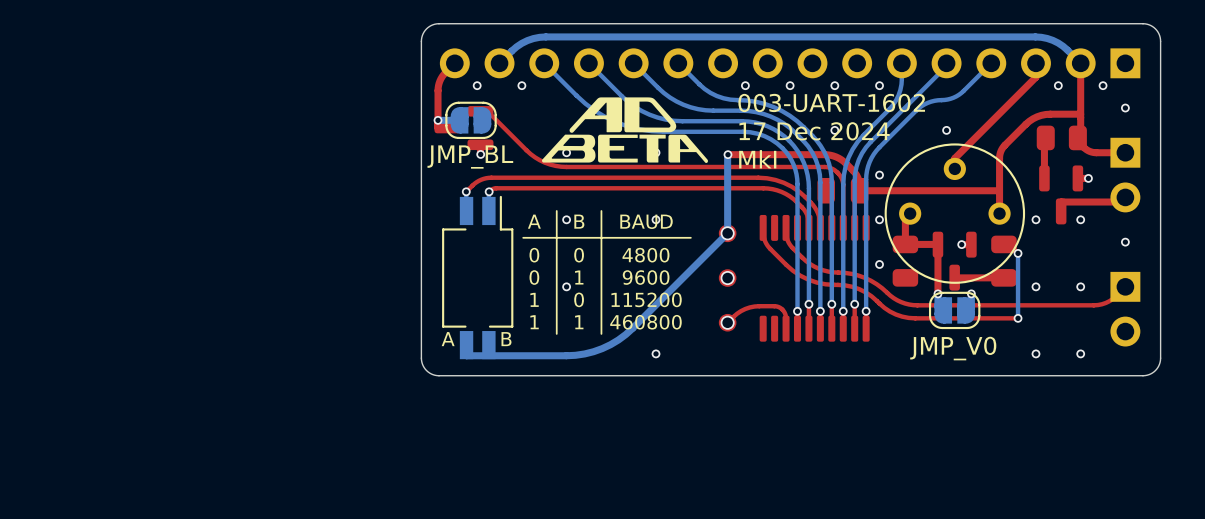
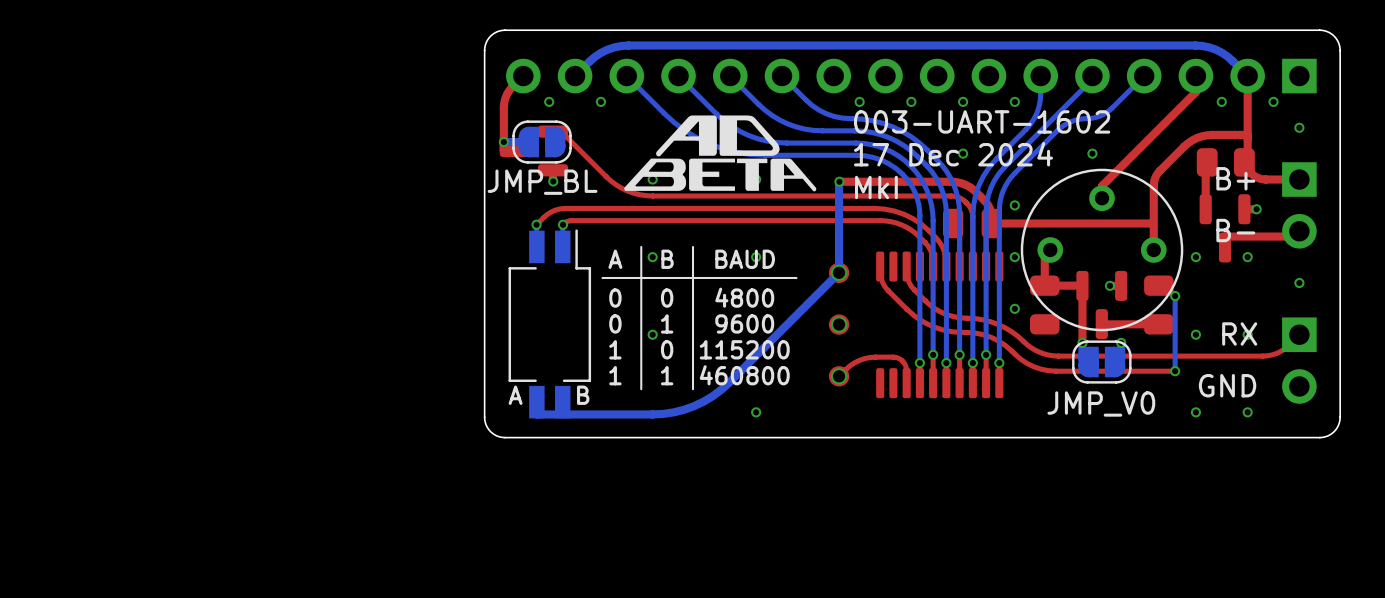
text: none -> B+ (1235, 178)
text: none -> B- (1235, 230)
text: none -> RX (1239, 333)
text: none -> GND (1227, 385)

